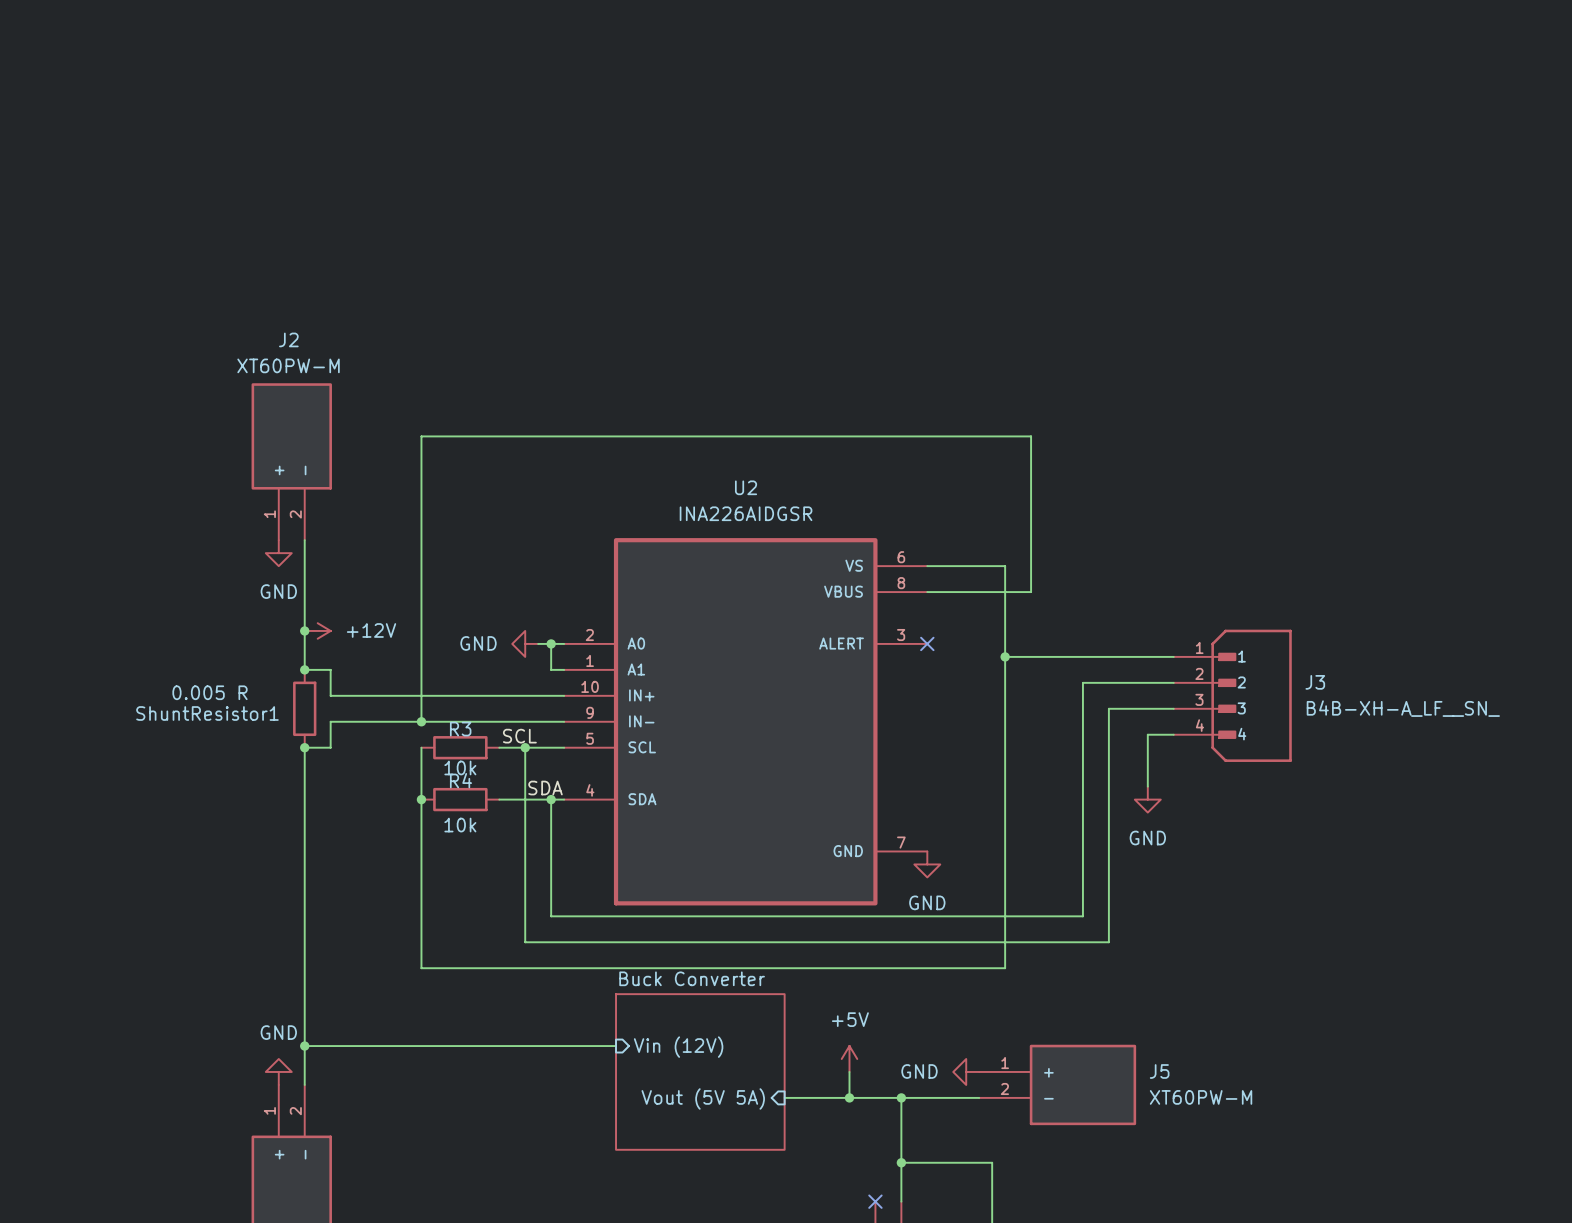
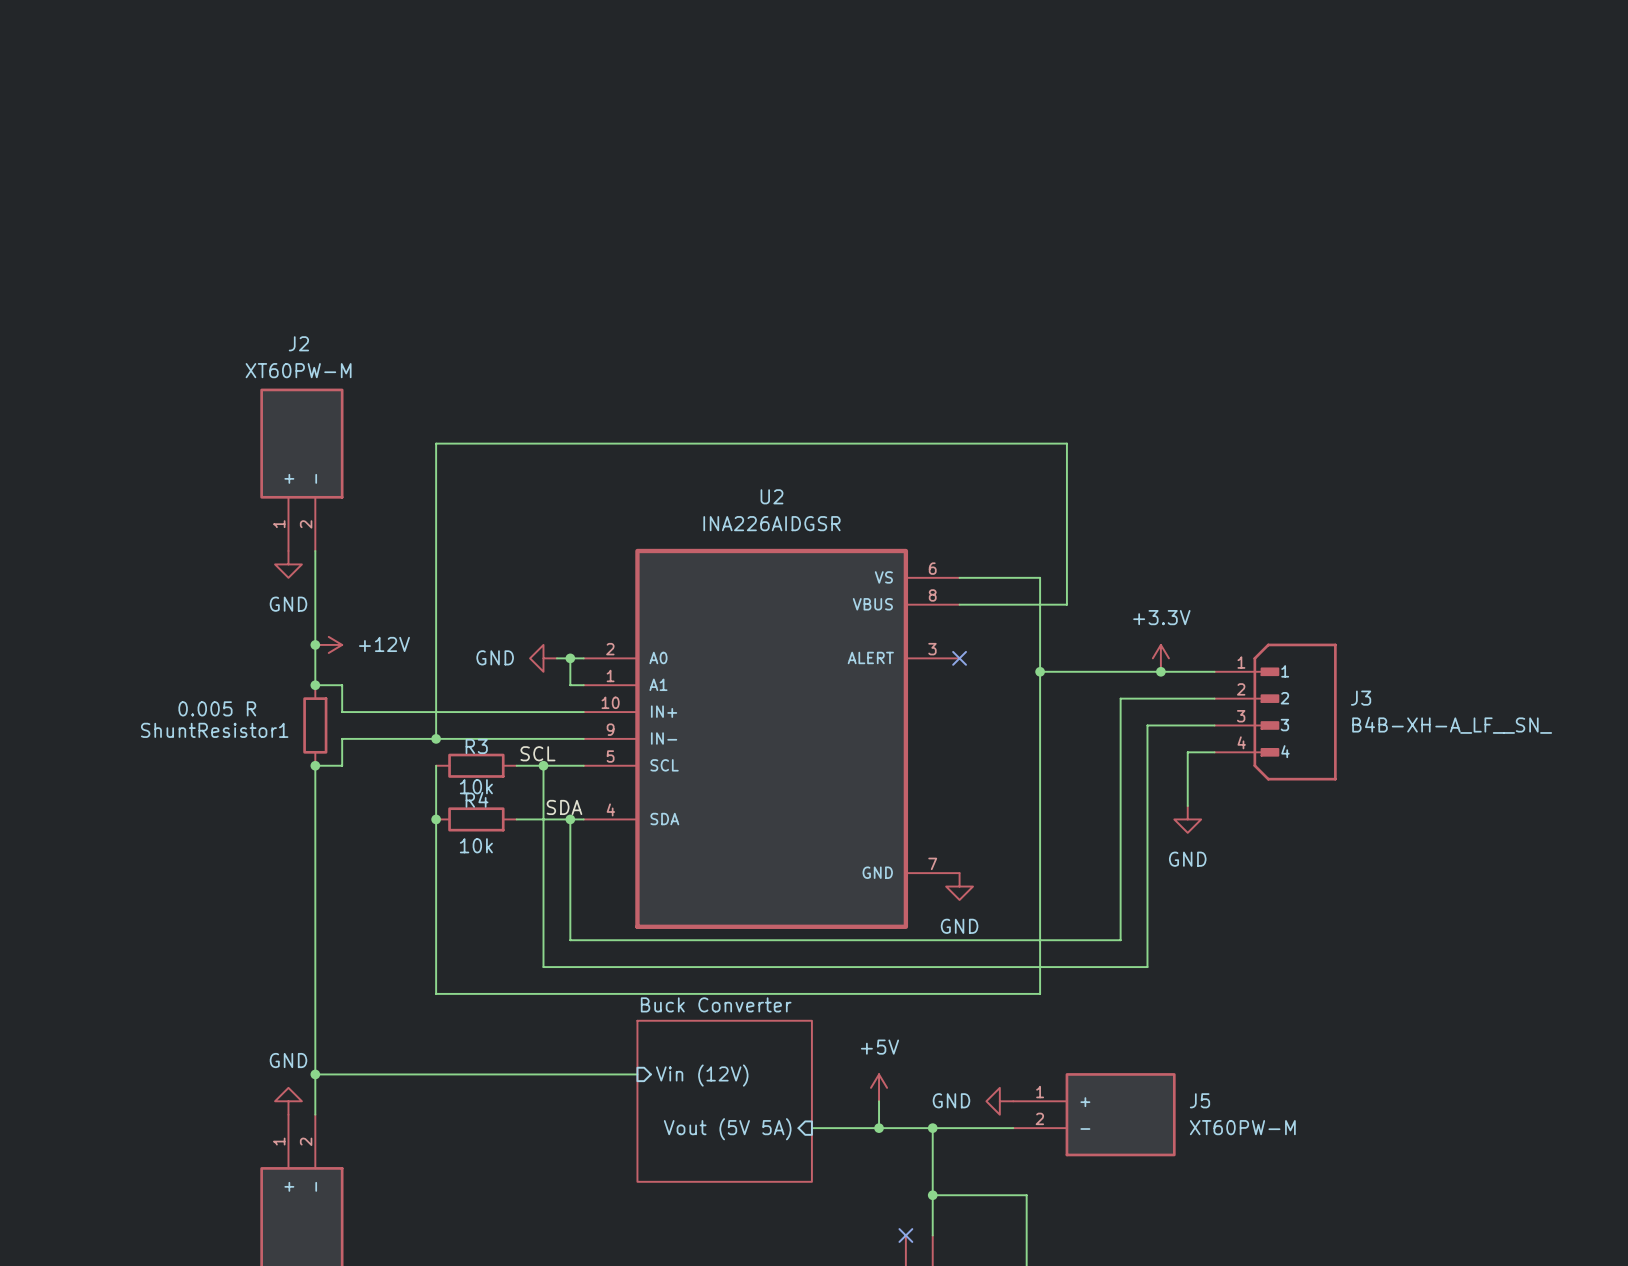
power symbol: none -> +3.3V (1160, 658)
junction: none -> (1160, 671)

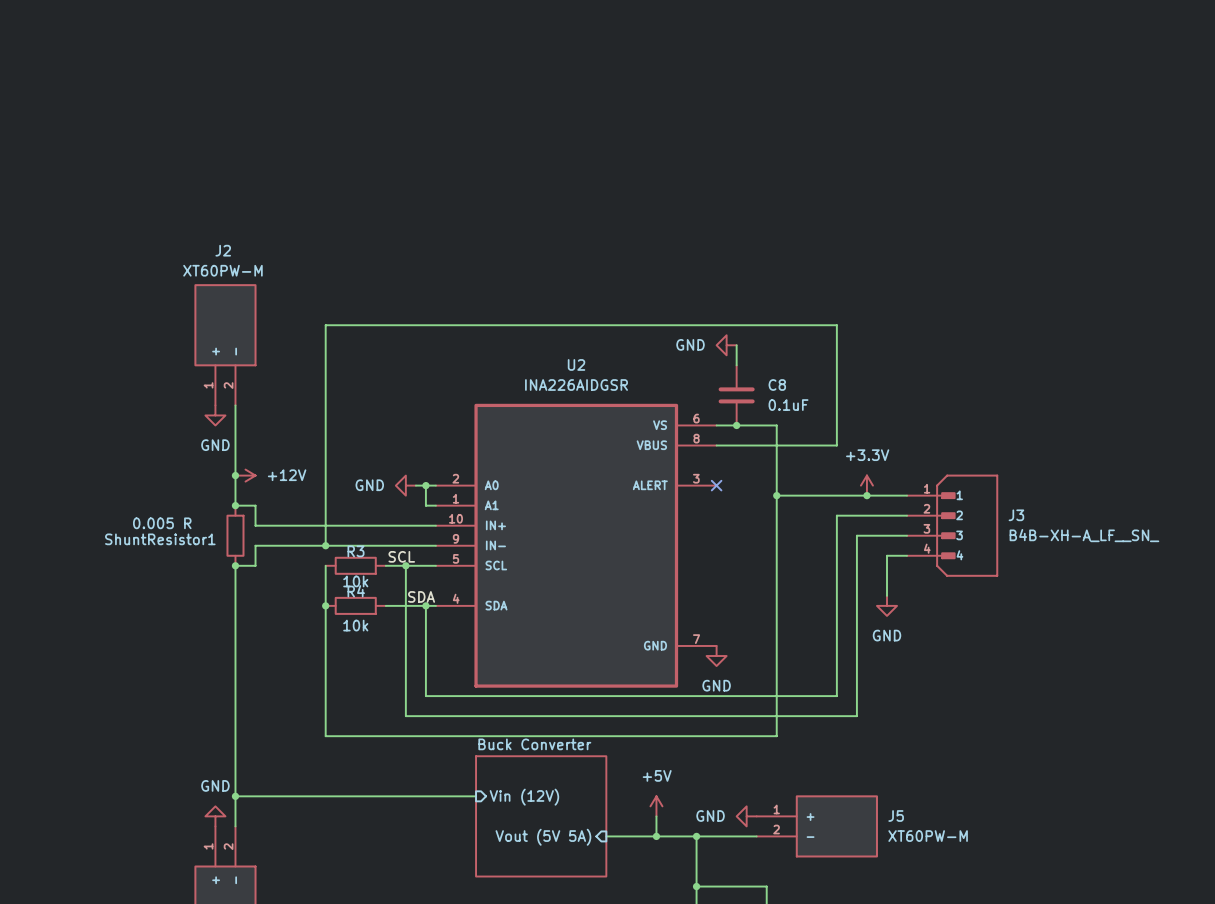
wire: (1066, 443) (1066, 604) -> (796, 325) (836, 325) (836, 445) (796, 445)
power symbol: none -> GND (726, 345)
wire: none -> (736, 345) (736, 365)
C8: none -> 0.1uF (736, 395)
junction: none -> (736, 425)

